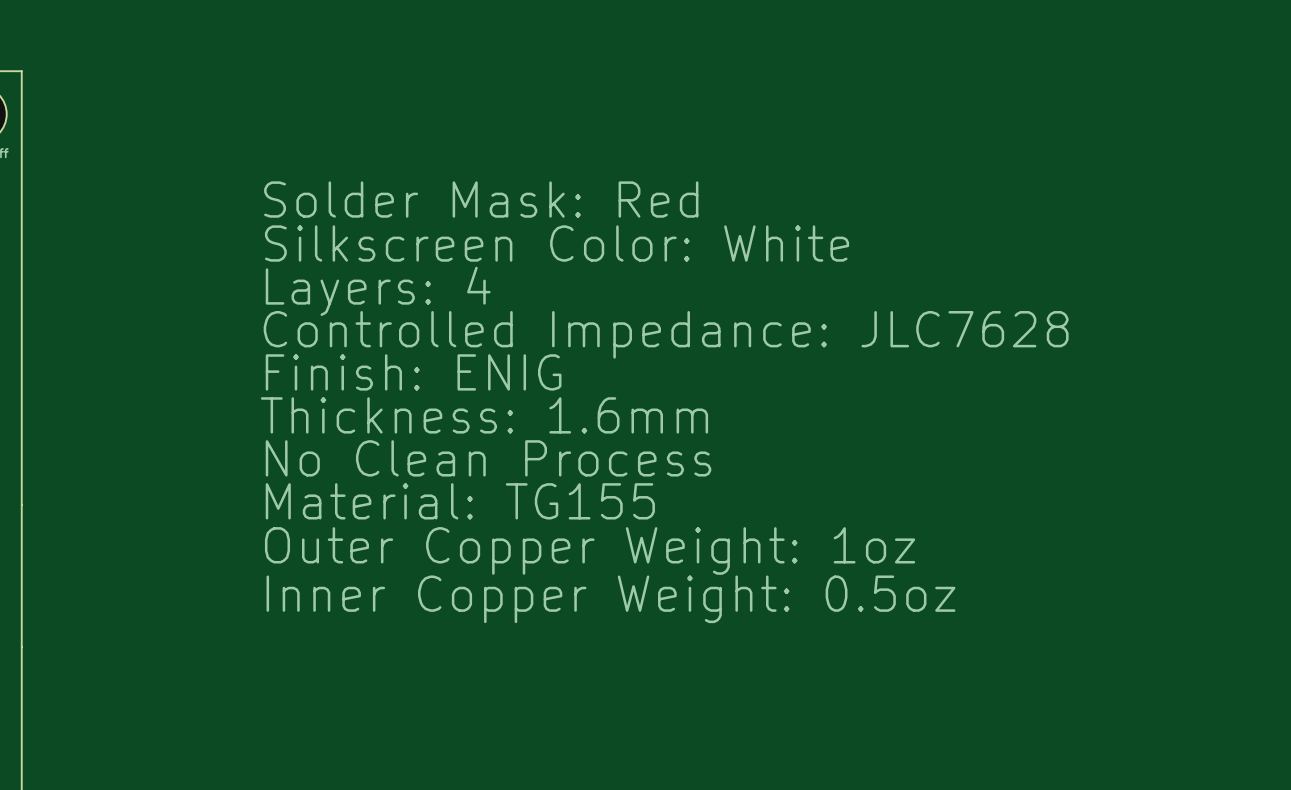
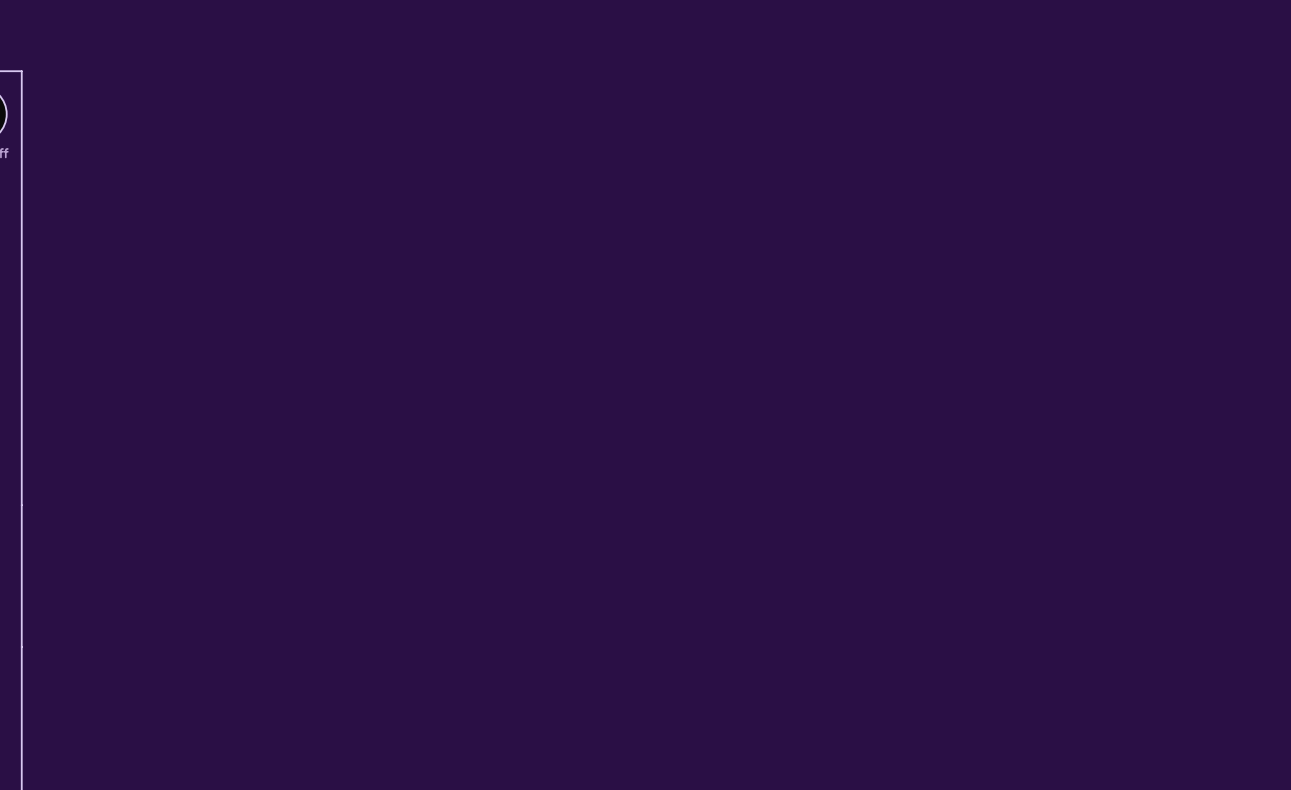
text: Solder Mask: Red (481, 199) -> none
text: Silkscreen Color: White (557, 243) -> none
text: Layers: 4 (378, 291) -> none
text: Controlled Impedance: JLC7628 (666, 334) -> none
text: Finish: ENIG (413, 372) -> none
text: Thickness: 1.6mm (484, 415) -> none
text: No Clean Process (488, 458) -> none
text: Material: TG155 (460, 501) -> none
text: Outer Copper Weight: 1oz (590, 550) -> none
text: Inner Copper Weight: 0.5oz (611, 599) -> none

